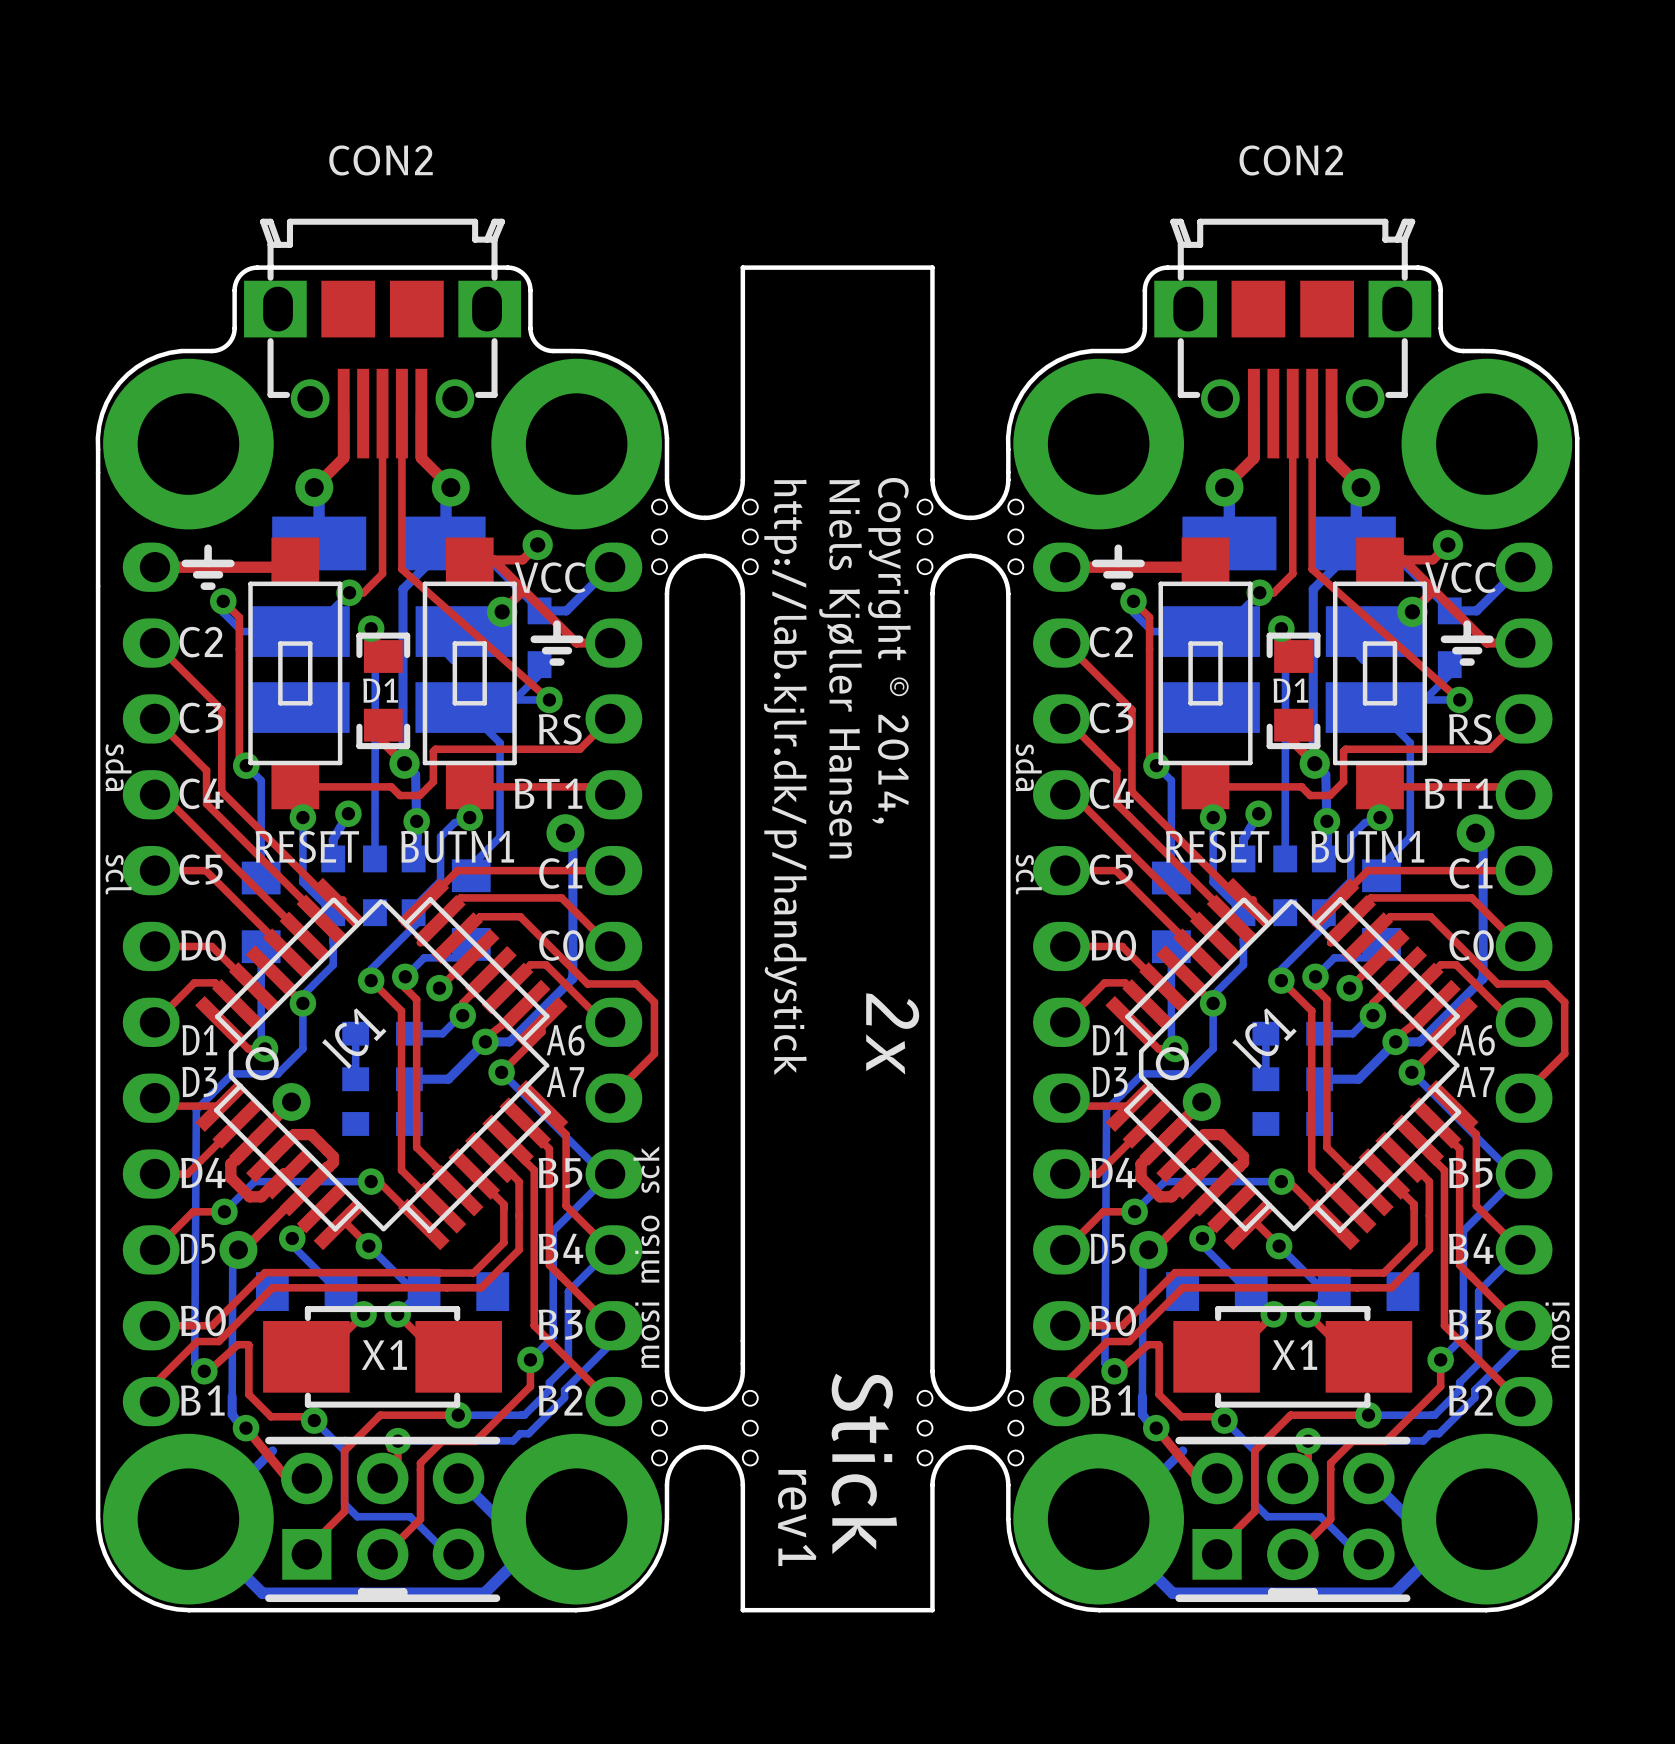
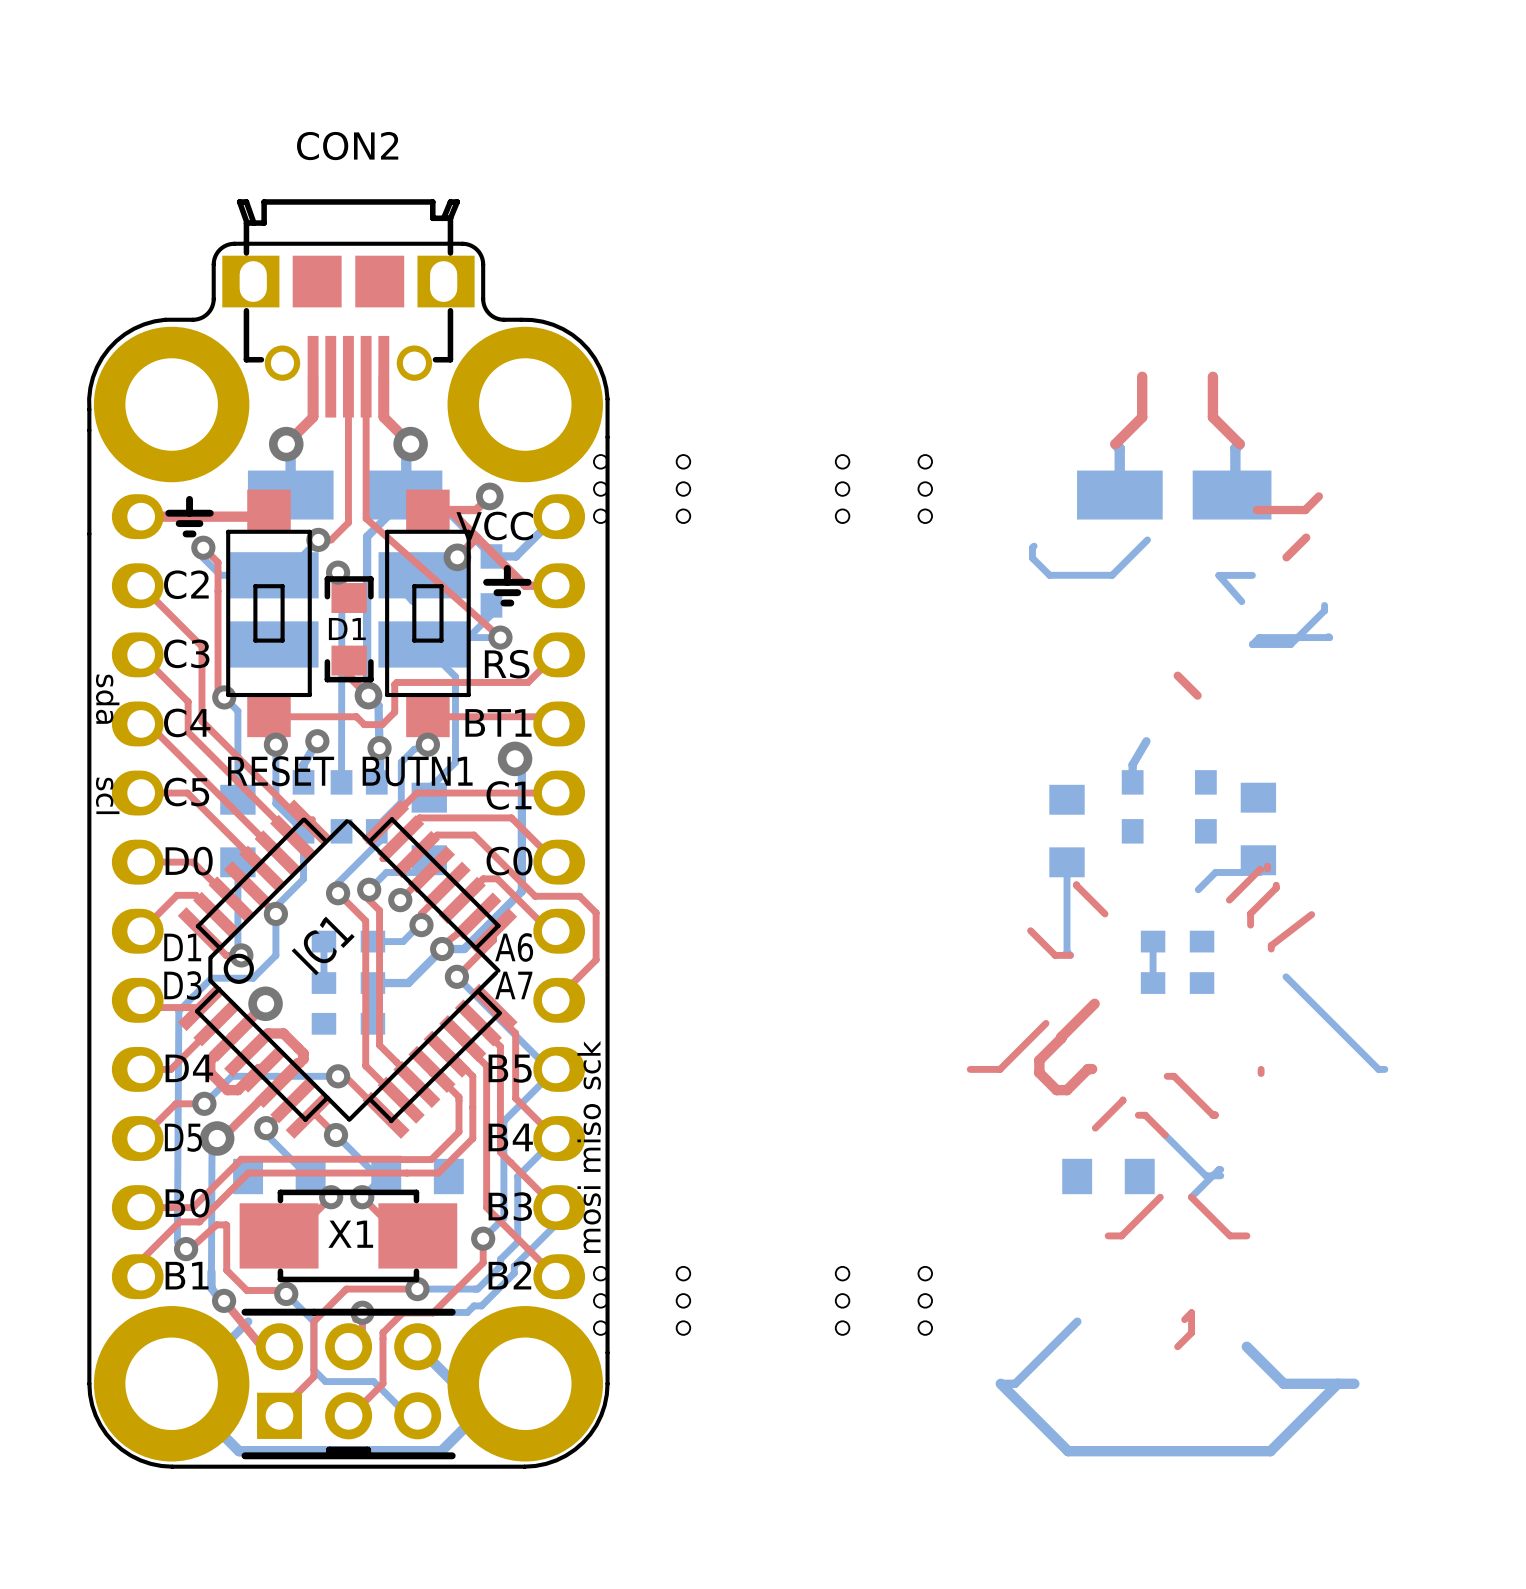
CON2: (1292, 338) -> none
top track: (1292, 413) (1292, 573) (1273, 592) (1259, 592) -> none
top track: (1312, 413) (1312, 569) (1459, 699) -> none
part: (1098, 444) -> none
part: (1486, 444) -> none
board edge: (666, 479) (669, 494) (678, 506) (690, 515) (704, 517) -> (607, 437) (607, 540)
via: (1224, 487) -> none
via: (1361, 487) -> none
board edge: (970, 517) (955, 515) (943, 506) (937, 498) (932, 484) (932, 267) (742, 267) (742, 484) (739, 494) (731, 506) (719, 515) (704, 517) -> none
board edge: (970, 517) (980, 516) (993, 510) (1005, 494) (1008, 479) (1009, 425) (1016, 403) (1029, 383) (1047, 367) (1068, 356) (1091, 351) (1125, 350) (1135, 346) (1141, 339) (1144, 331) (1145, 284) (1151, 274) (1161, 268) (1423, 268) (1434, 274) (1439, 284) (1440, 331) (1447, 344) (1460, 350) (1494, 351) (1517, 356) (1538, 367) (1556, 383) (1563, 393) (1573, 414) (1577, 438) (1577, 1519) (1574, 1542) (1565, 1564) (1550, 1583) (1531, 1597) (1521, 1603) (1498, 1609) (1087, 1609) (1064, 1603) (1053, 1597) (1034, 1583) (1027, 1574) (1020, 1564) (1011, 1542) (1008, 1519) (1008, 1480) (1005, 1470) (1000, 1461) (989, 1452) (975, 1447) (965, 1447) (947, 1454) (940, 1461) (933, 1475) (932, 1610) (742, 1610) (742, 1485) (737, 1466) (728, 1454) (719, 1449) (709, 1447) (695, 1448) (685, 1452) (674, 1461) (668, 1475) (666, 1485) -> none
via: (1447, 544) -> none
line: (1118, 548) (1118, 563) -> none
board edge: (970, 555) (984, 558) (997, 566) (1005, 579) (1008, 593) (1008, 1371) (1005, 1385) (997, 1398) (984, 1406) (970, 1409) (955, 1406) (943, 1398) (935, 1385) (932, 1371) (932, 593) (935, 579) (943, 566) (955, 558) (970, 555) -> none
top track: (1205, 559) (1198, 567) (1065, 567) -> none
top track: (1403, 559) (1486, 643) (1520, 643) (1520, 629) -> none
line: (1095, 563) (1141, 563) -> none
bottom track: (1520, 567) (1476, 610) (1449, 610) (1384, 543) (1356, 543) (1356, 546) (1313, 589) (1313, 762) (1325, 774) (1328, 822) (1326, 858) -> none
line: (1106, 574) (1129, 574) -> none
text: VCC (1460, 577) -> none
line: (1114, 586) (1122, 586) -> none
via: (1259, 592) -> none
board edge: (666, 593) (669, 579) (678, 566) (690, 558) (704, 555) (719, 558) (731, 566) (737, 574) (742, 588) (742, 1371) (739, 1385) (731, 1398) (719, 1406) (704, 1409) (690, 1406) (678, 1398) (669, 1385) (666, 1371) -> (607, 1352) (607, 1249)
top track: (1133, 601) (1149, 617) (1149, 758) (1156, 765) -> none
via: (1133, 601) -> none
via: (1412, 611) -> none
line: (1467, 624) (1467, 639) -> none
bottom track: (1281, 628) (1285, 632) (1285, 858) -> none
via: (1281, 628) -> none
part: (1292, 631) -> none
part: (1449, 637) -> none
line: (1444, 639) (1489, 639) -> none
text: C2 (1111, 642) -> none
top track: (1065, 643) (1131, 709) (1131, 791) (1243, 903) (1249, 903) (1253, 899) -> none
text: Copyright © 2014, (889, 650) -> none
line: (1455, 650) (1478, 650) -> none
line: (1463, 662) (1471, 662) -> none
text: Niels Kjøller Hansen (840, 669) -> none
part: (1205, 673) -> none
part: (1380, 673) -> none
D1: (1293, 690) -> none
via: (1459, 699) -> none
part: (1292, 707) -> none
bottom track: (1374, 707) (1410, 742) (1410, 837) (1380, 867) (1380, 874) -> none
text: C3 (1111, 717) -> none
top track: (1065, 718) (1116, 770) (1116, 803) (1232, 920) -> none
top track: (1520, 718) (1489, 749) (1345, 749) (1343, 751) (1343, 781) (1329, 795) (1310, 795) (1301, 786) (1205, 786) (1205, 809) (1213, 817) -> none
text: RS (1470, 729) -> none
via: (1314, 763) -> none
bottom track: (1156, 765) (1171, 780) (1171, 878) -> none
via: (1156, 765) -> none
text: sda (1028, 767) -> none
text: http://lab.kjlr.dk/p/handystick (785, 777) -> none
text: C4 (1111, 793) -> none
text: BT1 (1458, 793) -> none
top track: (1065, 794) (1072, 794) (1215, 937) -> none
top track: (1520, 794) (1512, 786) (1380, 786) (1380, 817) -> none
via: (1258, 813) -> none
bottom track: (1213, 817) (1213, 882) (1243, 912) (1243, 965) (1213, 995) (1213, 1048) (1188, 1073) (1142, 1073) (1106, 1109) (1104, 1363) (1114, 1371) -> none
via: (1213, 817) -> none
bottom track: (1380, 817) (1364, 822) (1350, 836) (1350, 880) (1326, 904) (1326, 923) (1281, 969) (1281, 980) -> none
via: (1380, 817) -> none
via: (1326, 821) -> none
bottom track: (1475, 833) (1483, 840) (1483, 978) (1419, 1041) (1395, 1041) -> none
via: (1475, 833) -> none
text: RESET (1217, 846) -> none
text: BUTN1 (1367, 846) -> none
text: C5 (1111, 869) -> none
top track: (1065, 870) (1116, 870) (1198, 954) -> none
top track: (1520, 870) (1367, 870) (1333, 904) -> none
text: C1 (1471, 873) -> none
text: scl (1028, 874) -> none
part: (1285, 885) -> none
top track: (1357, 917) (1330, 942) (1350, 918) (1370, 897) (1471, 897) (1520, 946) -> none
top track: (1367, 938) (1390, 916) (1430, 916) (1497, 983) (1546, 983) (1564, 1002) (1564, 1053) (1520, 1098) -> none
text: D0 (1113, 945) -> none
text: C0 (1471, 945) -> none
top track: (1065, 946) (1122, 946) (1165, 987) -> none
top track: (1315, 976) (1315, 988) (1326, 999) (1326, 1147) (1367, 1188) (1367, 1190) -> none
via: (1315, 976) -> none
top track: (1281, 980) (1311, 1010) (1311, 1170) (1350, 1207) -> none
via: (1281, 980) -> none
part: (1061, 984) -> none
part: (1524, 984) -> none
top track: (1417, 987) (1440, 964) (1456, 964) (1513, 1022) (1520, 1022) (1520, 1014) -> none
via: (1349, 988) -> none
via: (1213, 1003) -> none
top track: (1148, 1004) (1125, 982) (1104, 982) (1065, 1022) -> none
bottom track: (1372, 1015) (1352, 1033) (1319, 1033) -> none
via: (1372, 1015) -> none
top track: (1452, 1022) (1452, 1032) (1411, 1072) -> none
text: 2x (892, 1033) -> none
text: D1 (1110, 1040) -> none
text: A6 (1475, 1040) -> none
via: (1395, 1041) -> none
bottom track: (1395, 1042) (1358, 1079) (1319, 1079) (1319, 1123) -> none
via: (1175, 1048) -> none
IC1: (1291, 1064) -> none
via: (1411, 1072) -> none
text: D3 (1110, 1081) -> none
text: A7 (1475, 1081) -> none
top track: (1065, 1098) (1073, 1106) (1131, 1106) -> none
via: (1201, 1101) -> none
top track: (1452, 1105) (1452, 1110) (1476, 1134) (1476, 1205) (1520, 1249) -> none
part: (1292, 1123) -> none
top track: (1435, 1123) (1459, 1149) (1459, 1265) (1520, 1325) -> none
top track: (1418, 1140) (1418, 1144) (1444, 1170) (1444, 1325) (1520, 1401) -> none
bottom track: (1520, 1155) (1520, 1174) (1463, 1230) (1463, 1337) (1440, 1359) -> none
top track: (1182, 1156) (1204, 1134) (1221, 1134) (1243, 1156) (1243, 1162) (1153, 1249) (1148, 1249) -> none
top track: (1401, 1157) (1405, 1157) (1429, 1181) (1429, 1249) (1391, 1287) (1182, 1287) (1129, 1341) (1107, 1341) (1065, 1383) (1065, 1401) (1069, 1401) -> none
text: D4 (1113, 1172) -> none
text: B5 (1470, 1173) -> none
top track: (1384, 1174) (1414, 1204) (1414, 1242) (1383, 1273) (1349, 1273) -> none
bottom track: (1281, 1181) (1164, 1181) (1134, 1211) (1137, 1211) -> none
via: (1281, 1181) -> none
via: (1134, 1211) -> none
top track: (1129, 1217) (1134, 1211) (1103, 1211) (1065, 1249) -> none
bottom track: (1202, 1238) (1204, 1246) (1245, 1290) -> none
via: (1202, 1238) -> none
via: (1279, 1246) -> none
text: D5 (1108, 1248) -> none
text: B4 (1471, 1248) -> none
via: (1148, 1249) -> none
bottom track: (1520, 1249) (1478, 1291) (1478, 1363) (1459, 1382) (1459, 1390) (1434, 1415) (1368, 1415) -> none
bottom track: (1145, 1253) (1148, 1249) (1148, 1258) (1142, 1263) (1142, 1414) (1152, 1428) (1156, 1428) -> none
top track: (1349, 1272) (1175, 1272) (1122, 1325) (1065, 1325) -> none
part: (1368, 1291) -> none
via: (1273, 1314) -> none
via: (1307, 1314) -> none
text: B0 (1113, 1321) -> none
text: B3 (1470, 1324) -> none
bottom track: (1520, 1325) (1520, 1344) (1474, 1390) (1474, 1397) (1438, 1433) (1430, 1433) (1423, 1440) (1308, 1440) -> none
text: mosi (1557, 1335) -> none
X1: (1292, 1356) -> none
top track: (1440, 1359) (1440, 1386) (1385, 1441) (1352, 1441) (1330, 1463) (1330, 1519) (1292, 1557) (1292, 1560) -> none
via: (1440, 1359) -> none
top track: (1114, 1371) (1118, 1371) (1148, 1344) (1158, 1344) (1159, 1394) (1181, 1416) (1220, 1416) (1224, 1420) -> none
via: (1114, 1371) -> none
text: B1 (1113, 1400) -> none
text: B2 (1470, 1400) -> none
top track: (1368, 1415) (1290, 1415) (1254, 1450) (1254, 1511) (1216, 1549) (1216, 1560) -> none
via: (1368, 1415) -> none
bottom track: (1224, 1420) (1254, 1450) (1254, 1503) (1267, 1516) (1320, 1516) (1364, 1560) (1368, 1560) -> none
via: (1224, 1420) -> none
top track: (1156, 1428) (1197, 1478) (1217, 1478) -> none
via: (1156, 1428) -> none
via: (1308, 1441) -> none
text: Stick (864, 1463) -> none
text: rev1 (797, 1517) -> none
part: (1098, 1519) -> none
part: (1292, 1519) -> none
part: (1486, 1519) -> none

